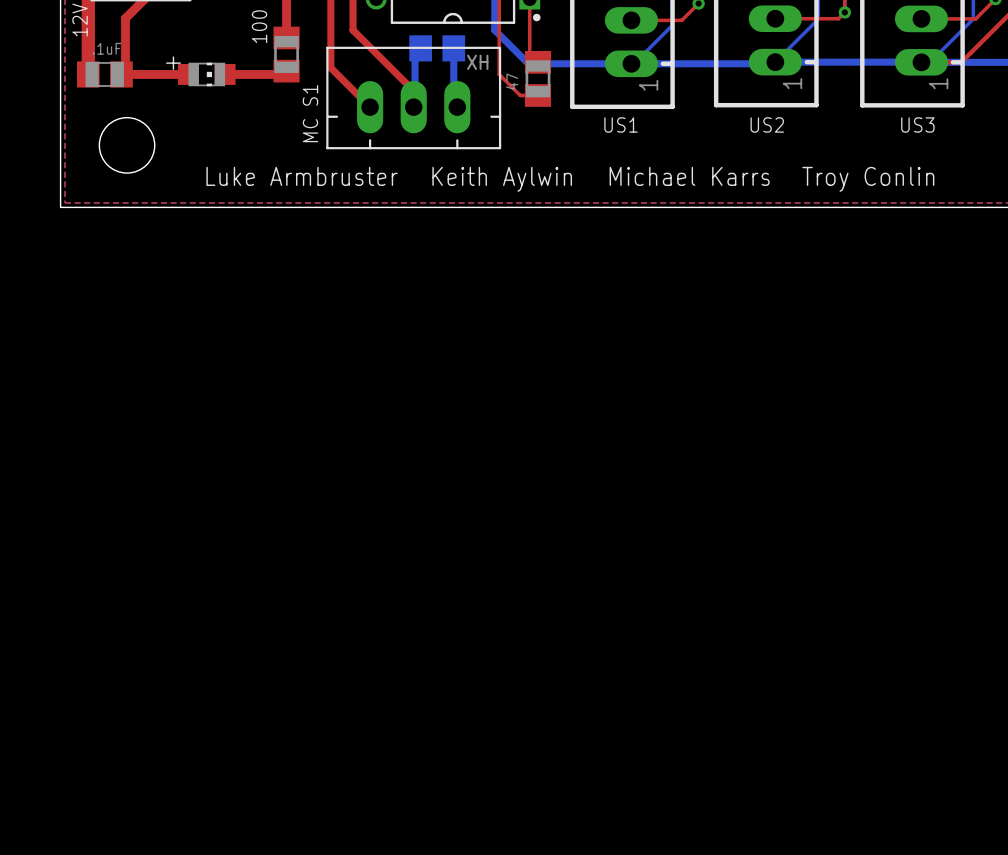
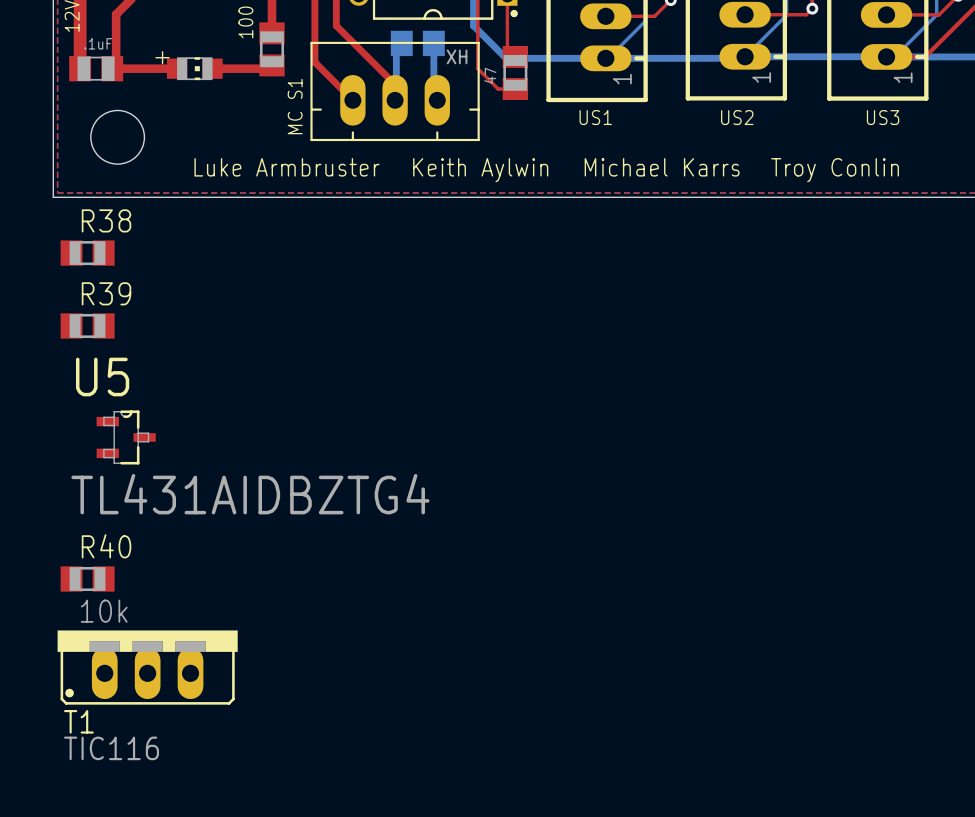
R38: none -> (87, 253)
R39: none -> (87, 325)
U5: none -> TL431AIDBZTG4 (126, 437)
R40: none -> 10k (87, 578)
T1: none -> TIC116 (147, 667)

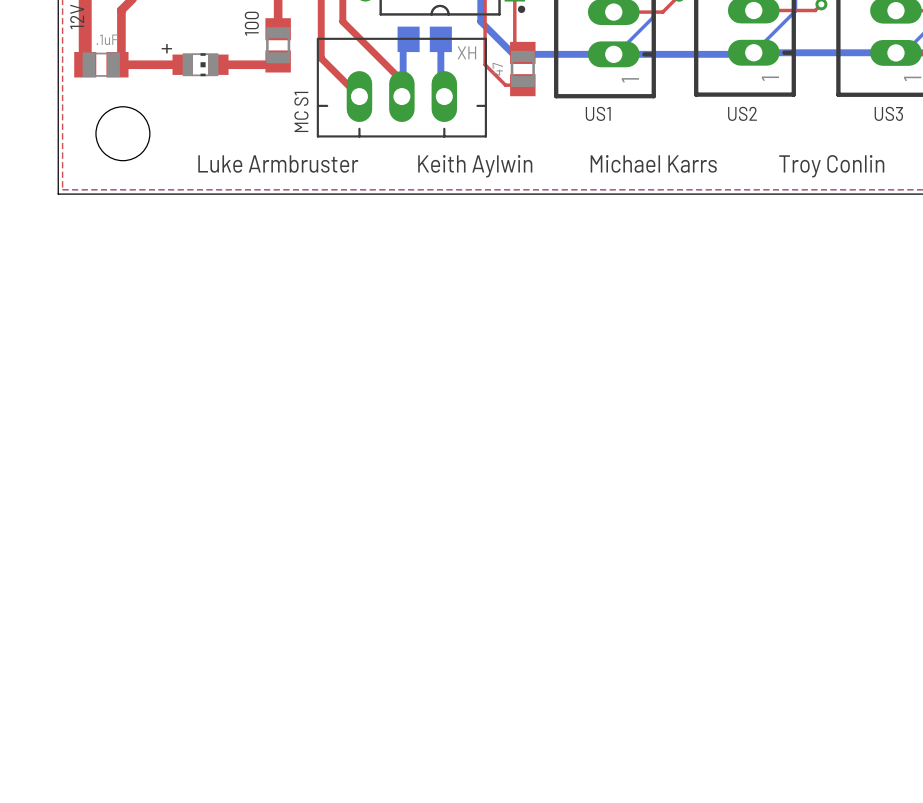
R38: (87, 253) -> none
R39: (87, 325) -> none
U5: TL431AIDBZTG4 (126, 437) -> none
R40: 10k (87, 578) -> none
T1: TIC116 (147, 667) -> none

